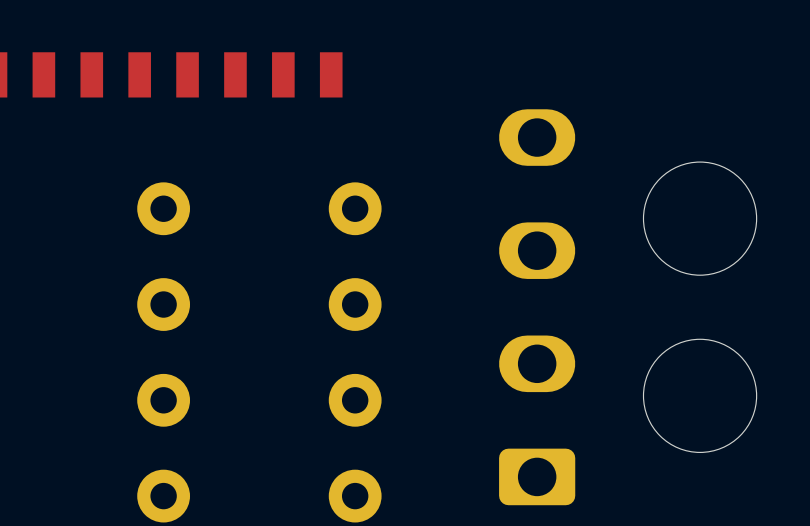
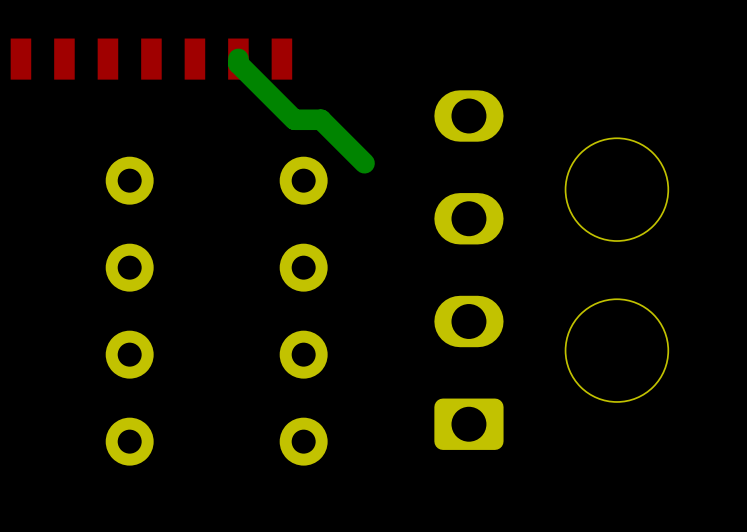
bottom track: none -> (238, 58) (238, 63) (294, 119)
bottom track: none -> (294, 119) (321, 119) (364, 163)

